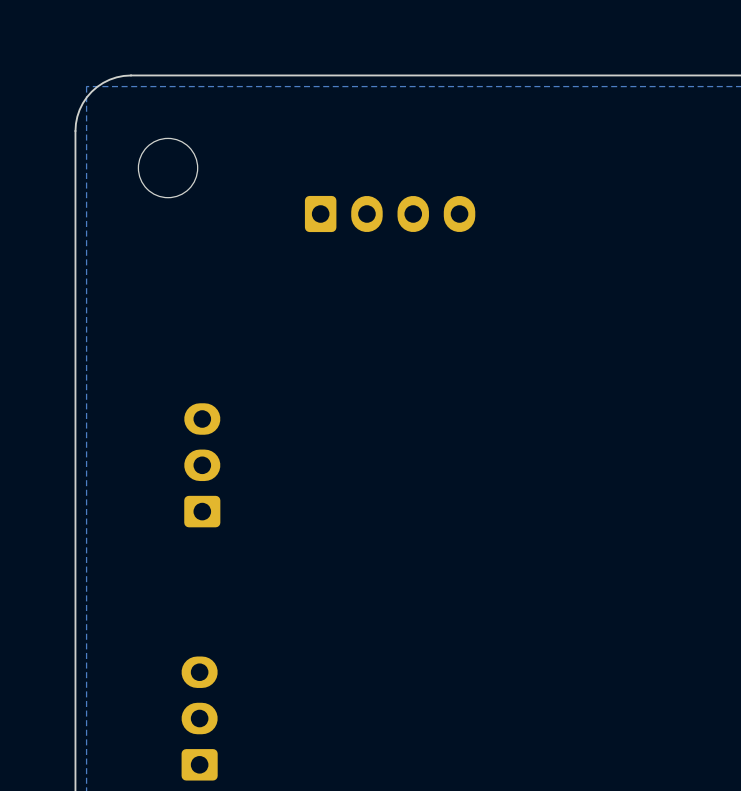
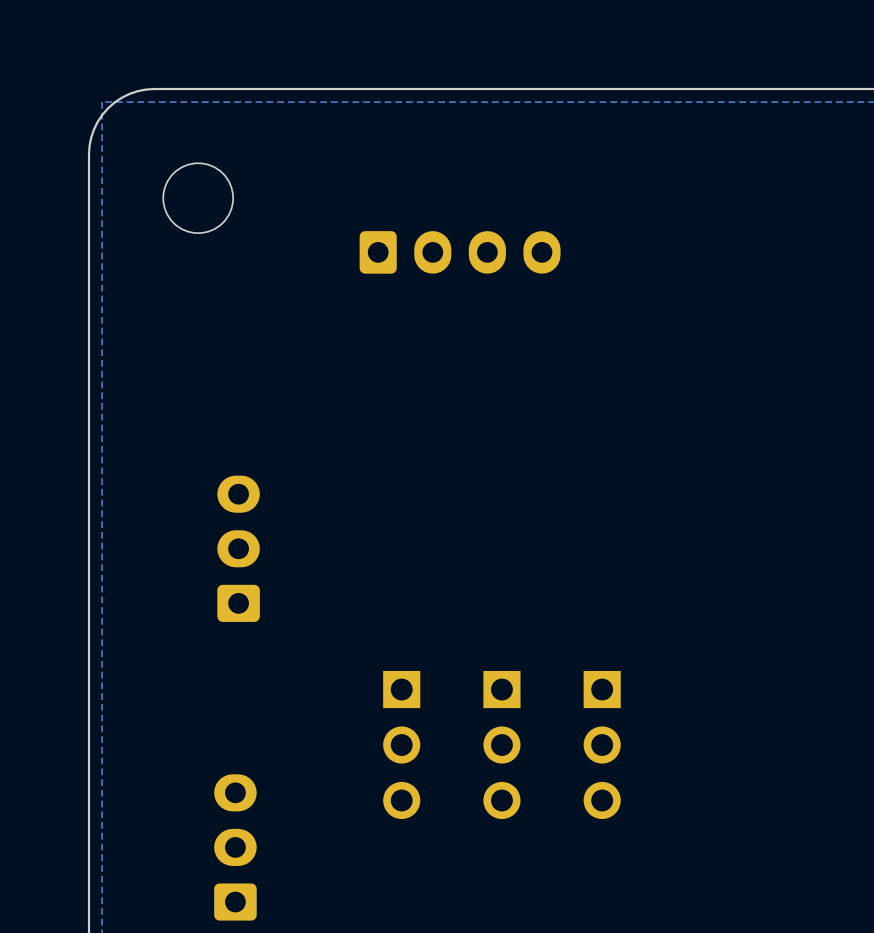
part: none -> (401, 745)
part: none -> (501, 745)
part: none -> (602, 745)

